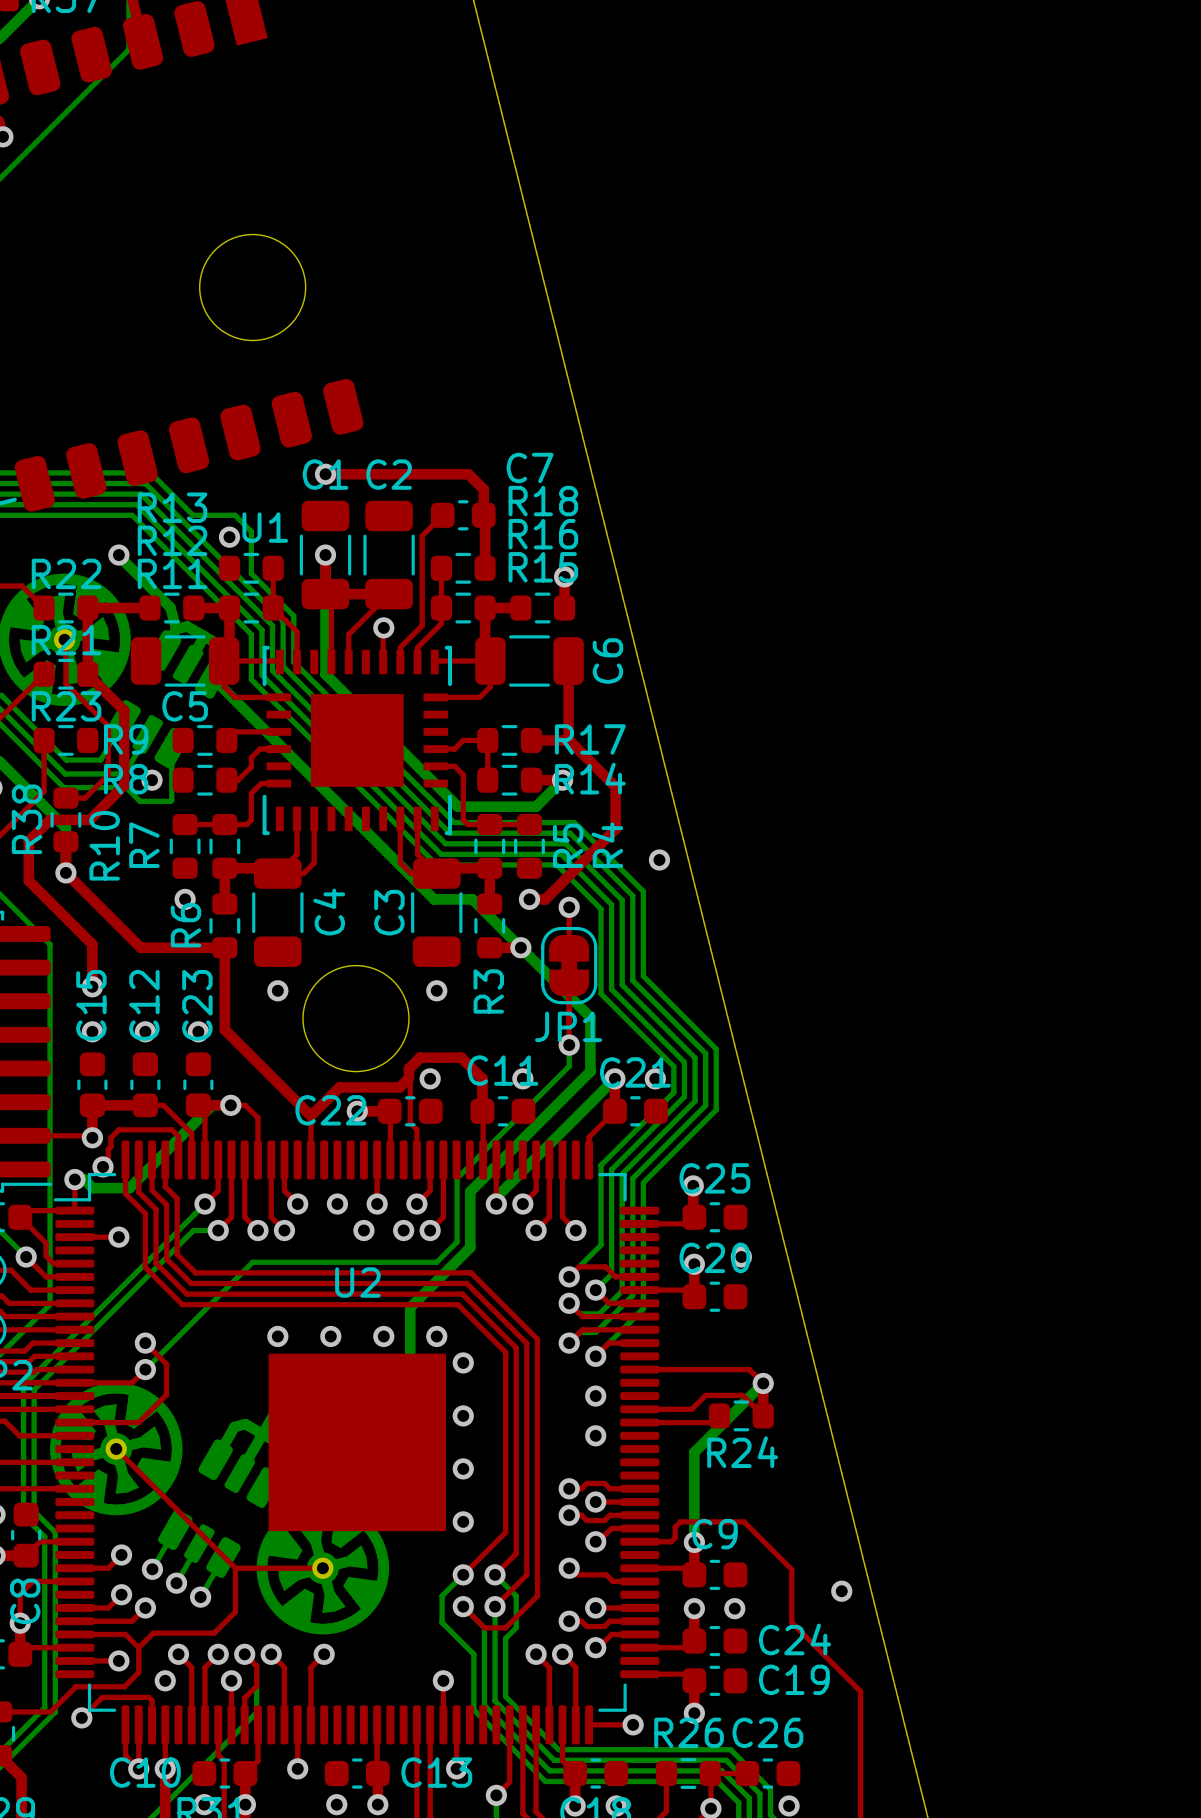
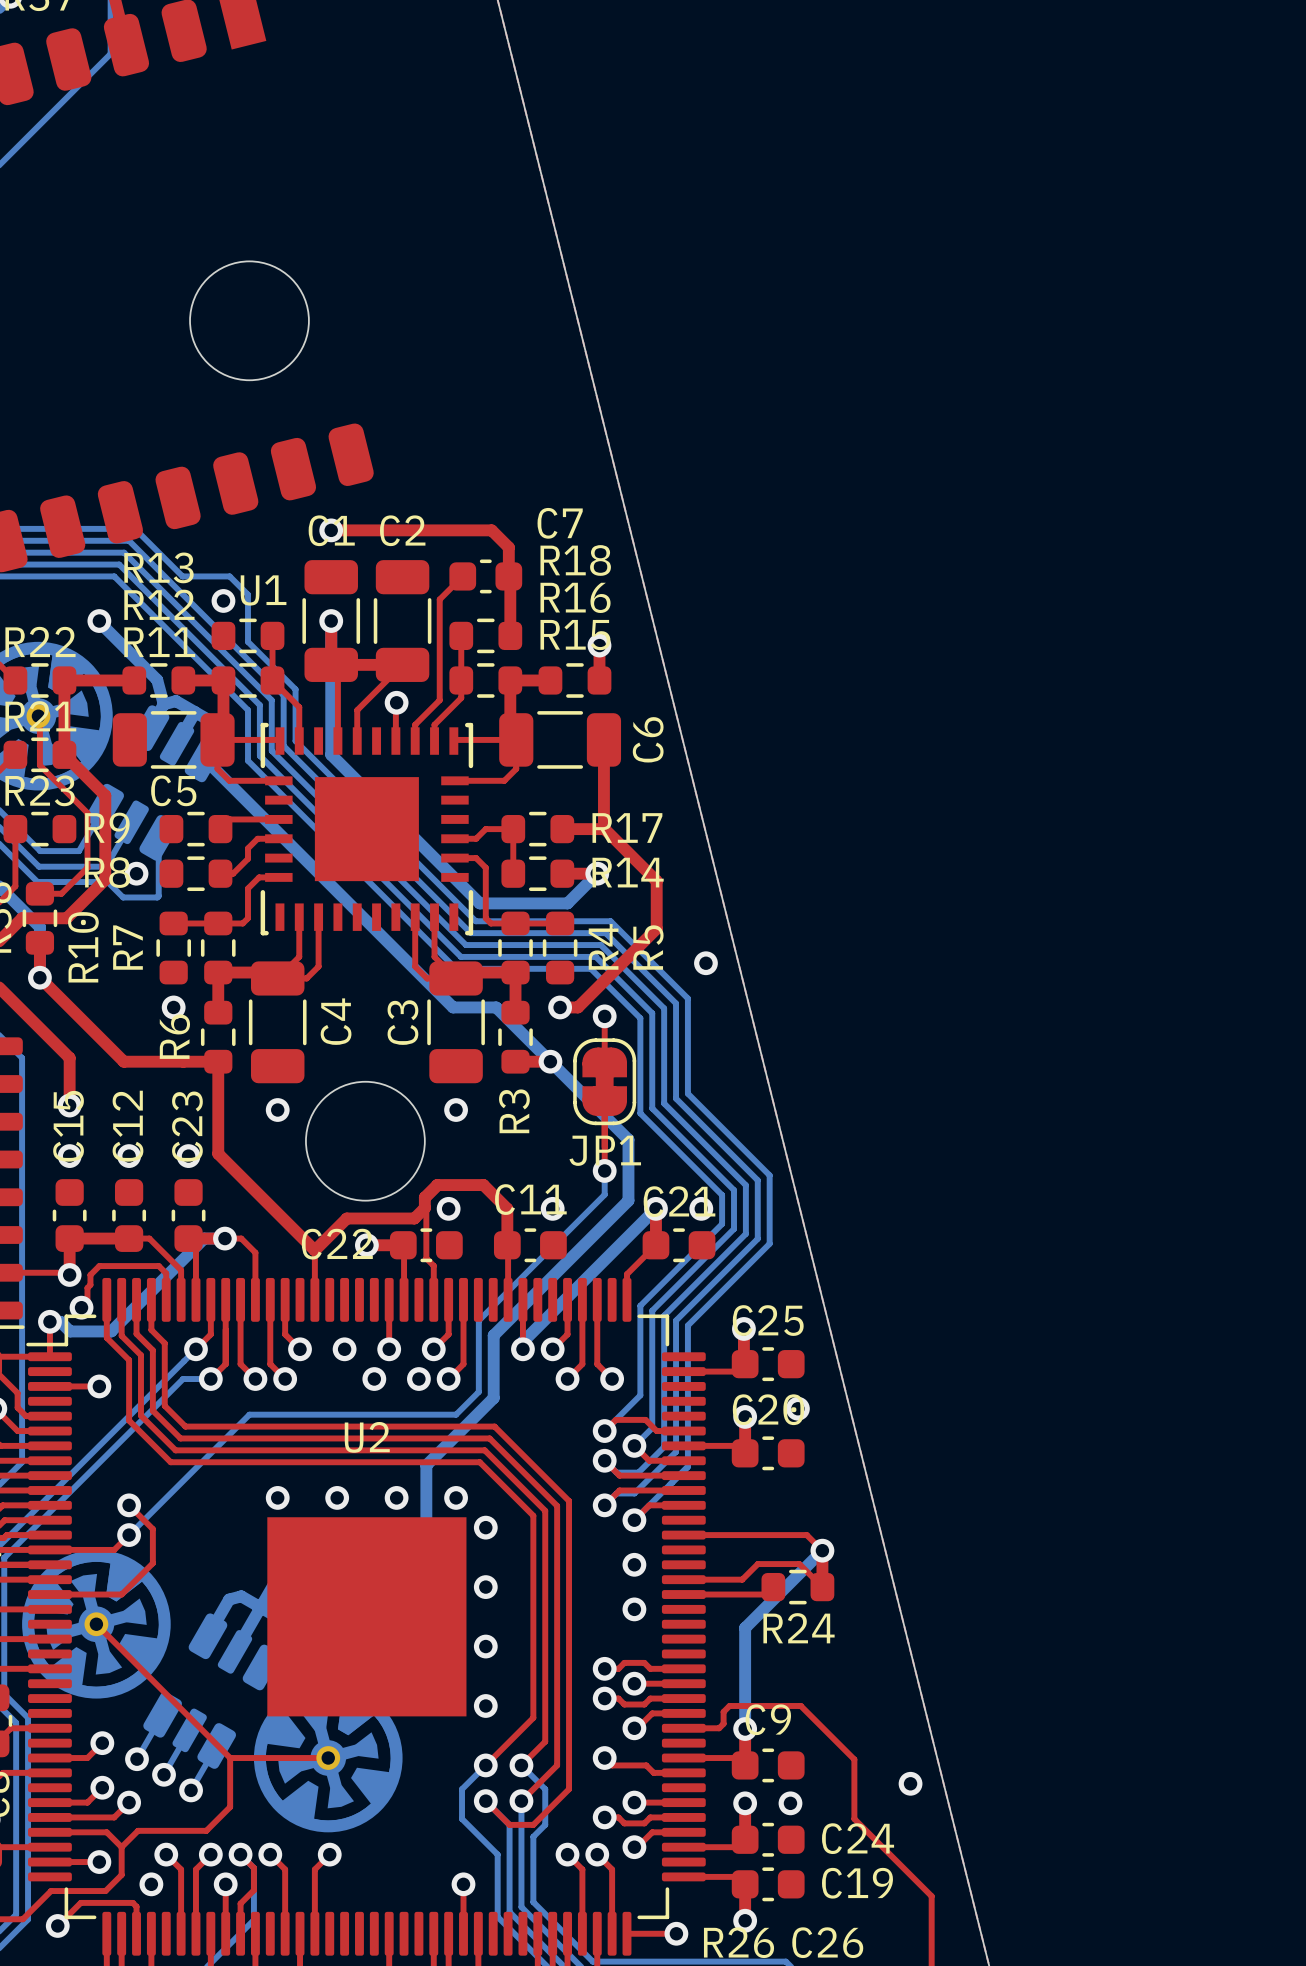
R5 name position: R5 (568, 845) -> R5 (648, 947)
R4 name position: R4 (607, 845) -> R4 (603, 946)

